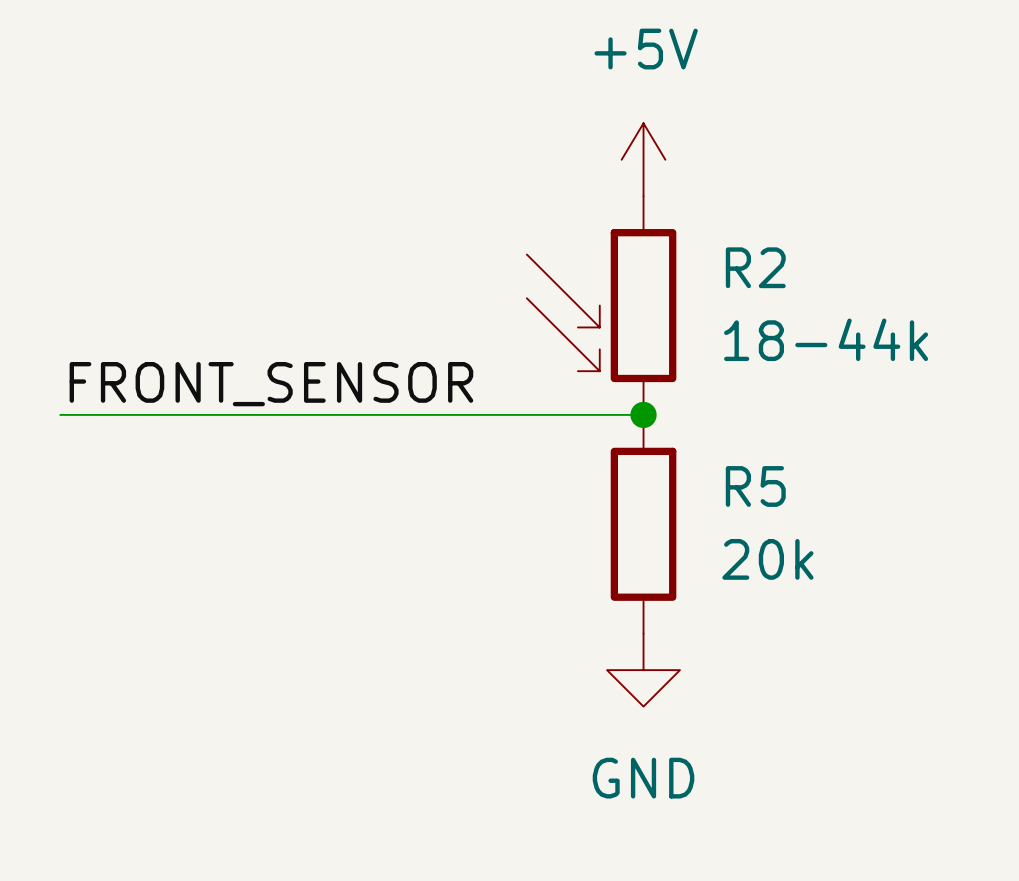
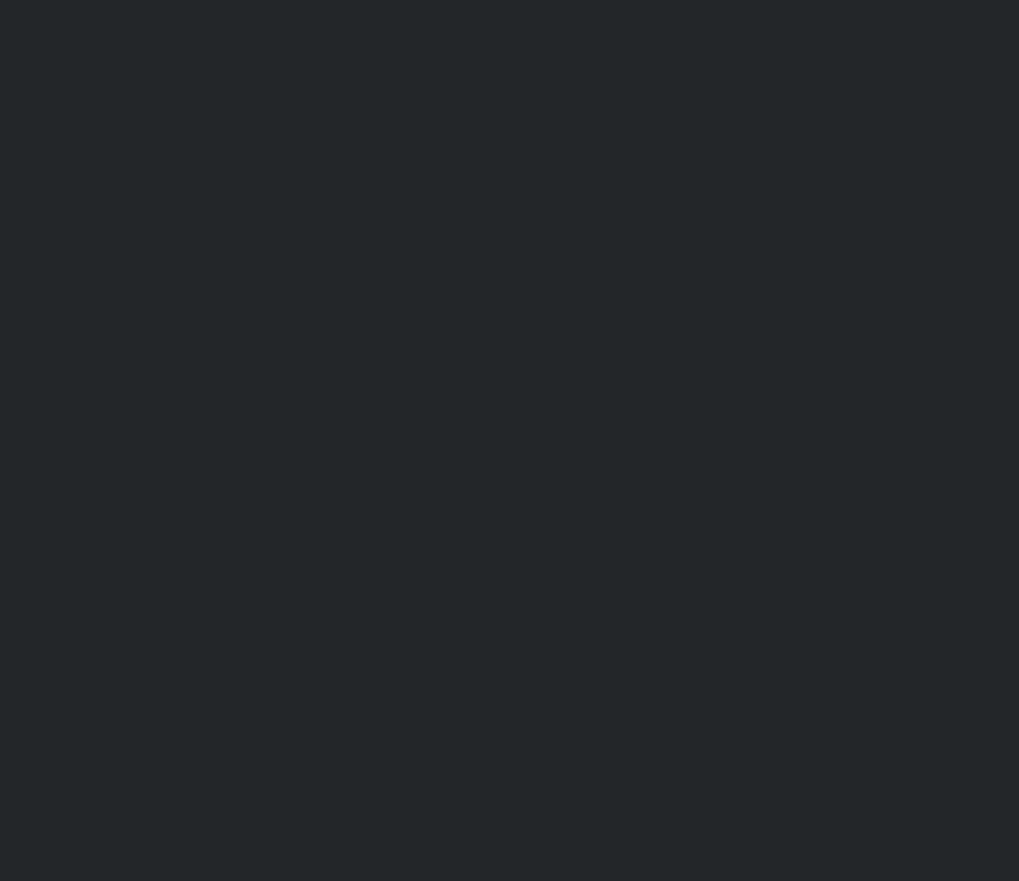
power symbol: +5V (643, 159) -> none
R2: 18-44k (601, 305) -> none
label: FRONT_SENSOR (271, 384) -> none
wire: (60, 414) (643, 414) -> none
junction: (643, 414) -> none
R5: 20k (643, 524) -> none
power symbol: GND (643, 670) -> none

